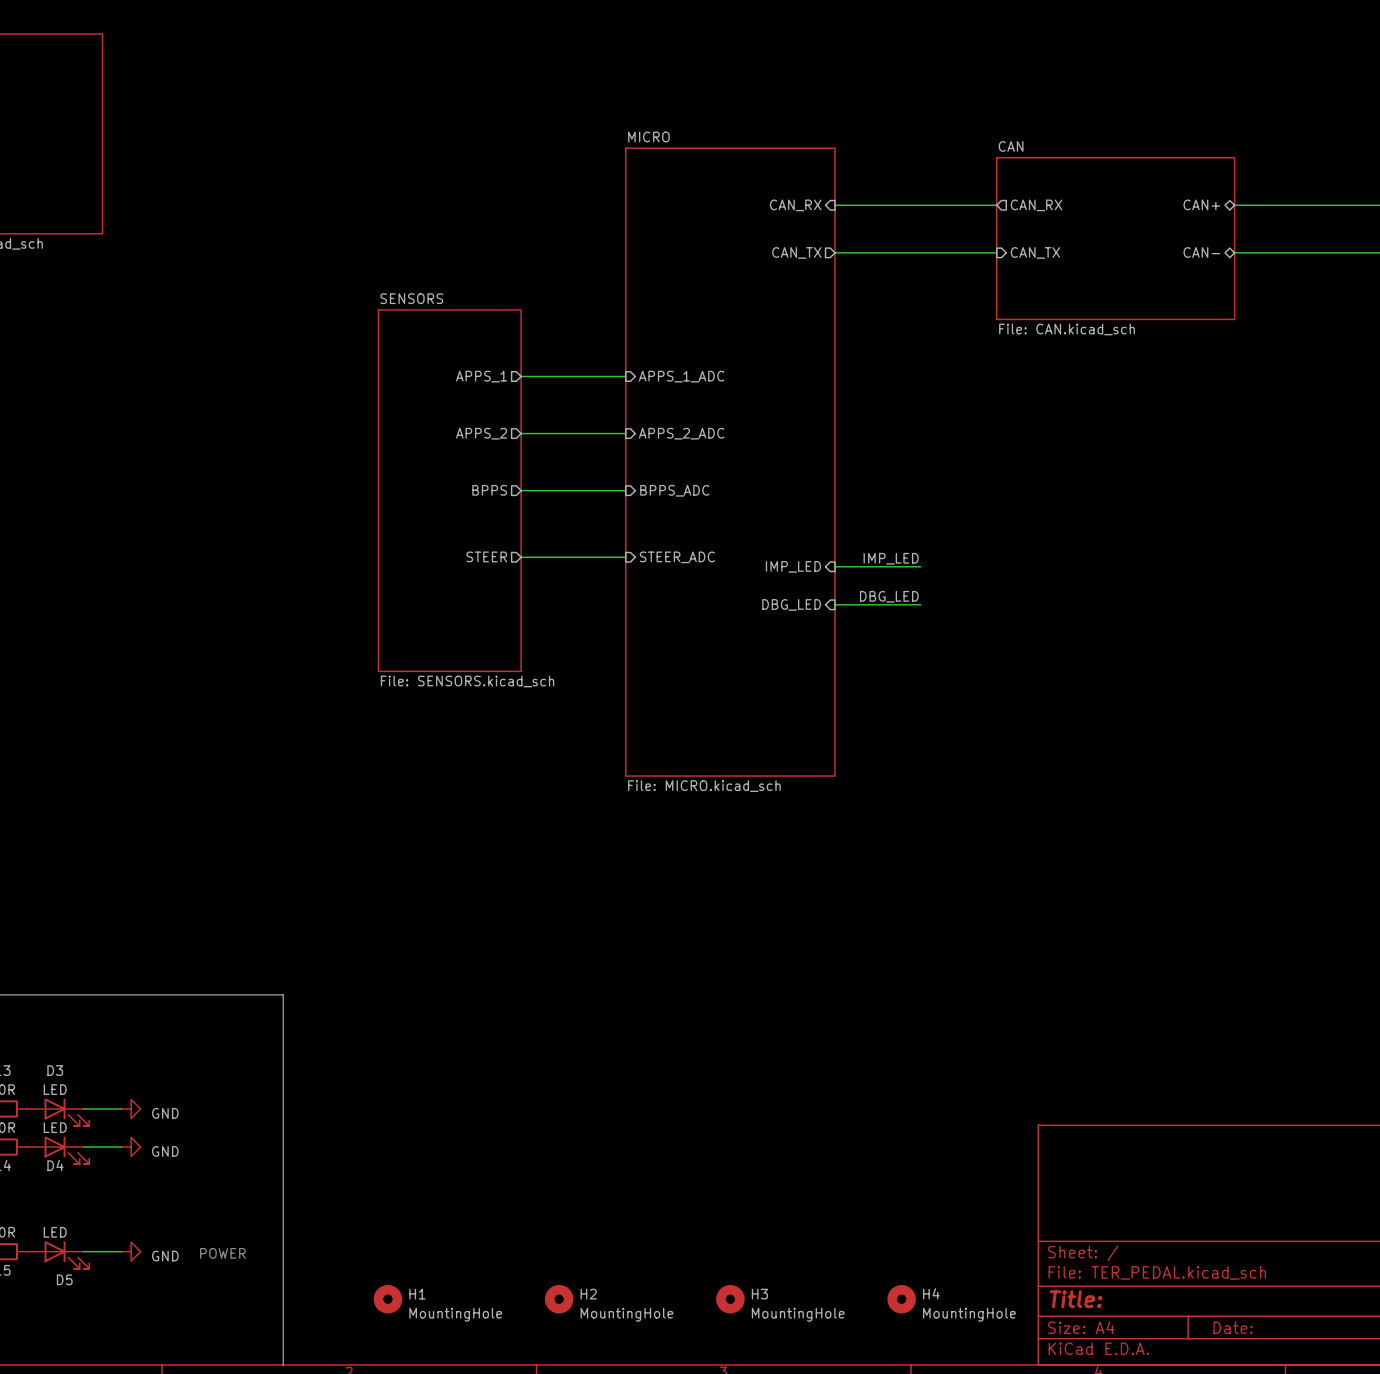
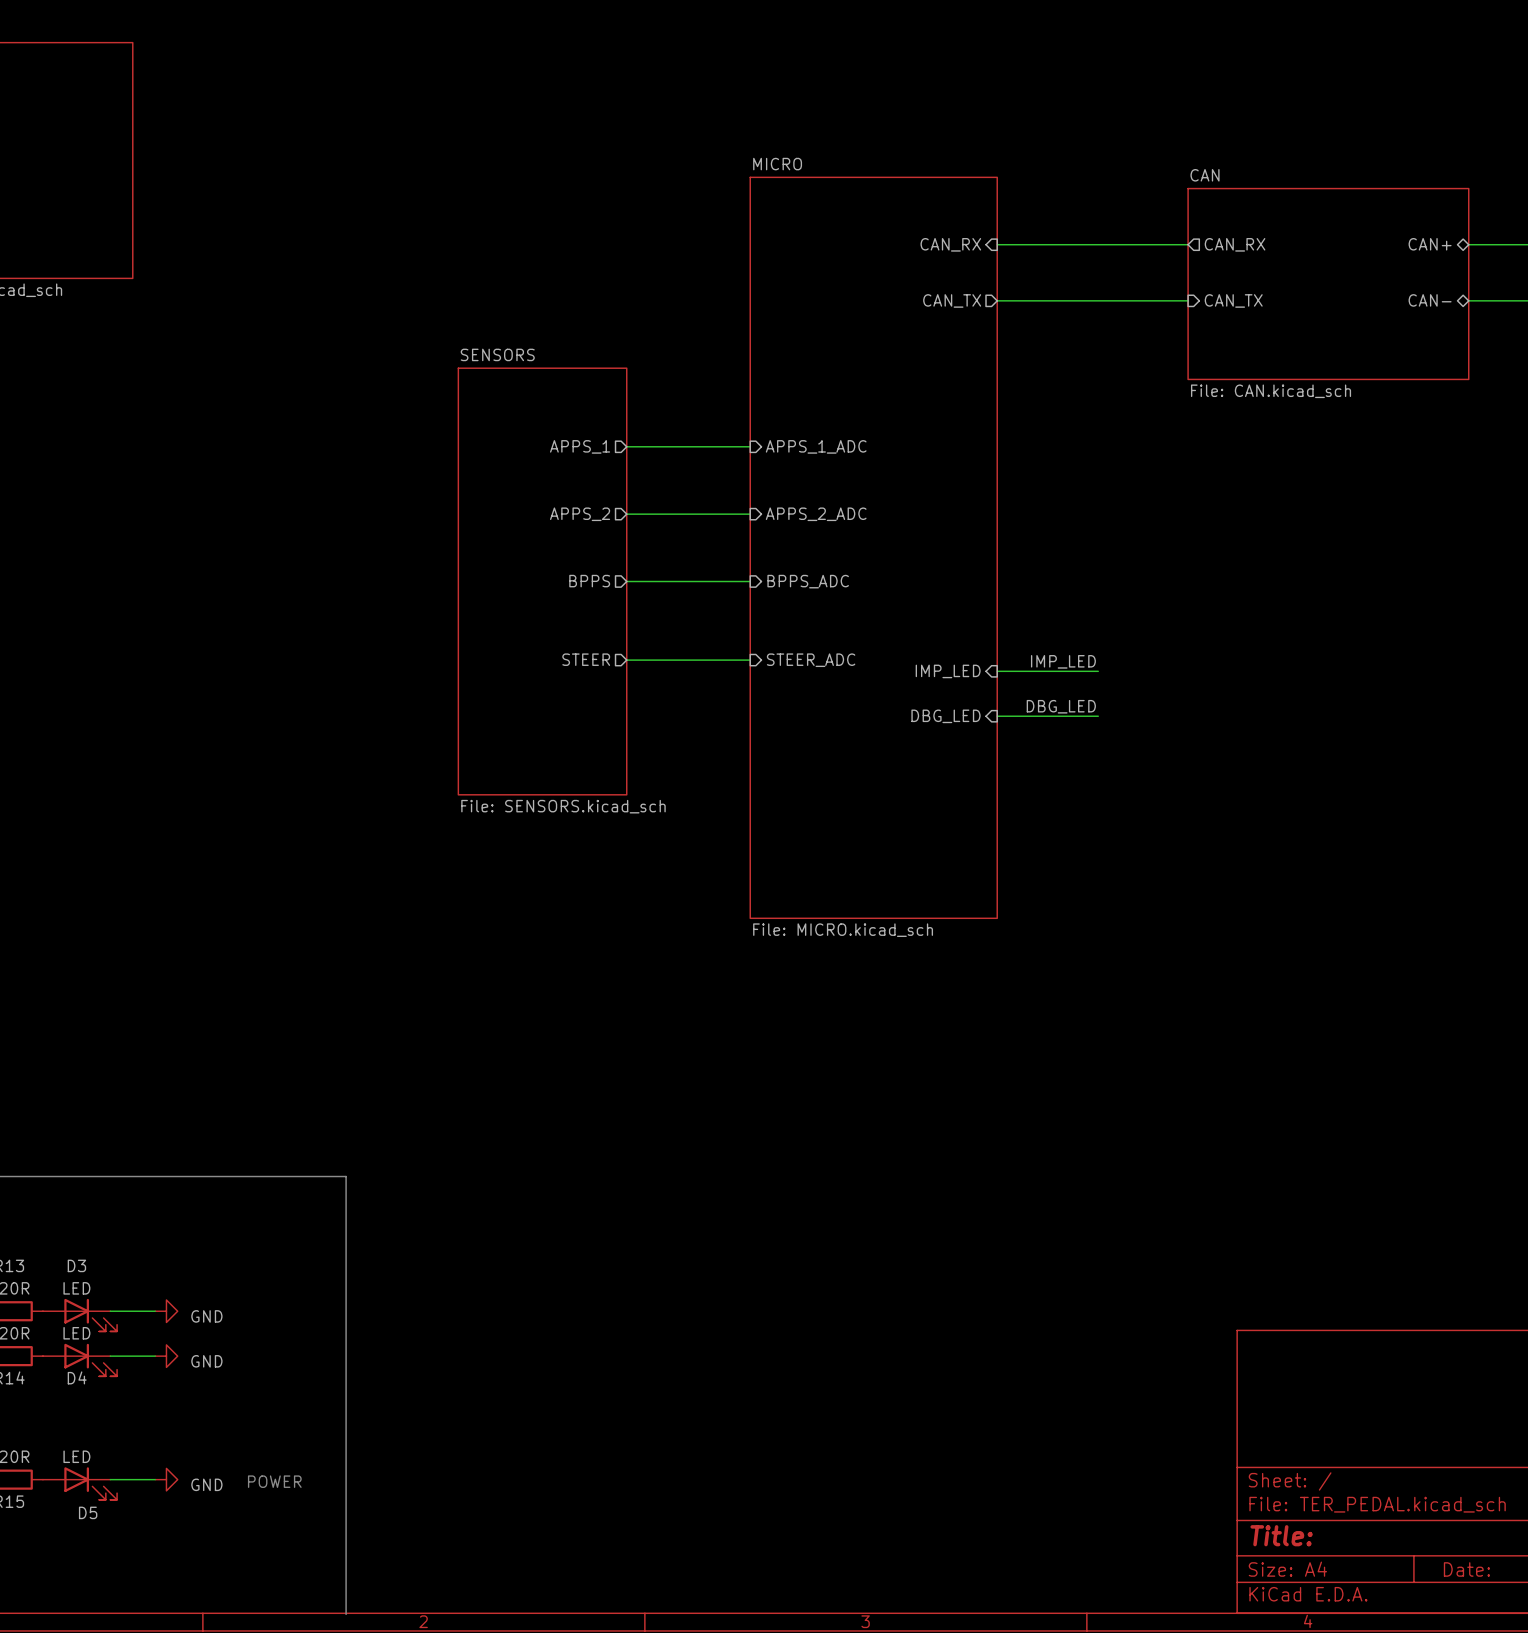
H1: MountingHole (387, 1299) -> none
H2: MountingHole (559, 1299) -> none
H3: MountingHole (730, 1299) -> none
H4: MountingHole (901, 1299) -> none

